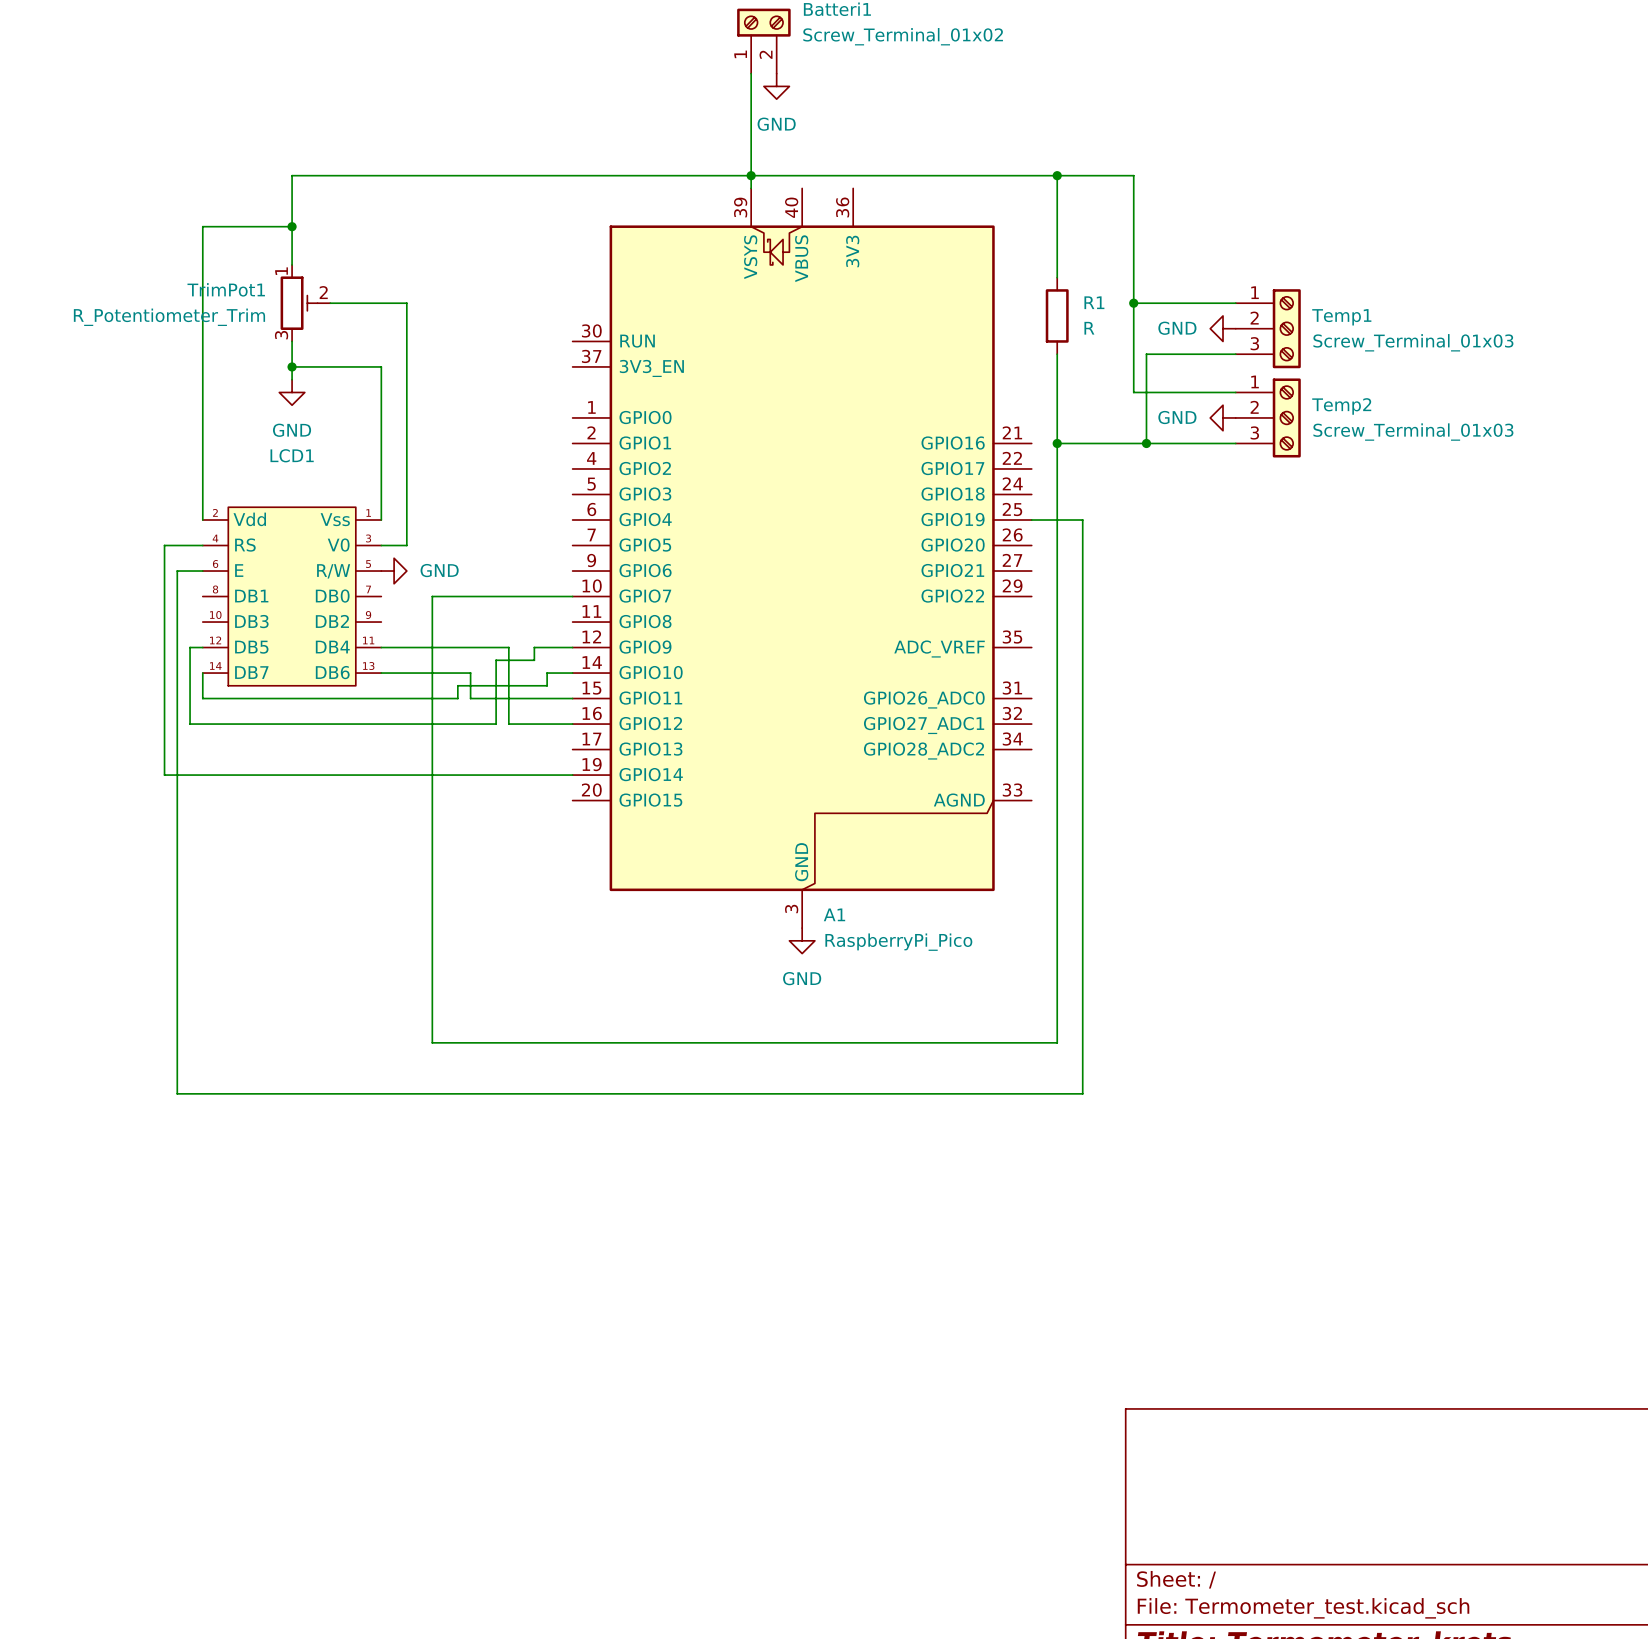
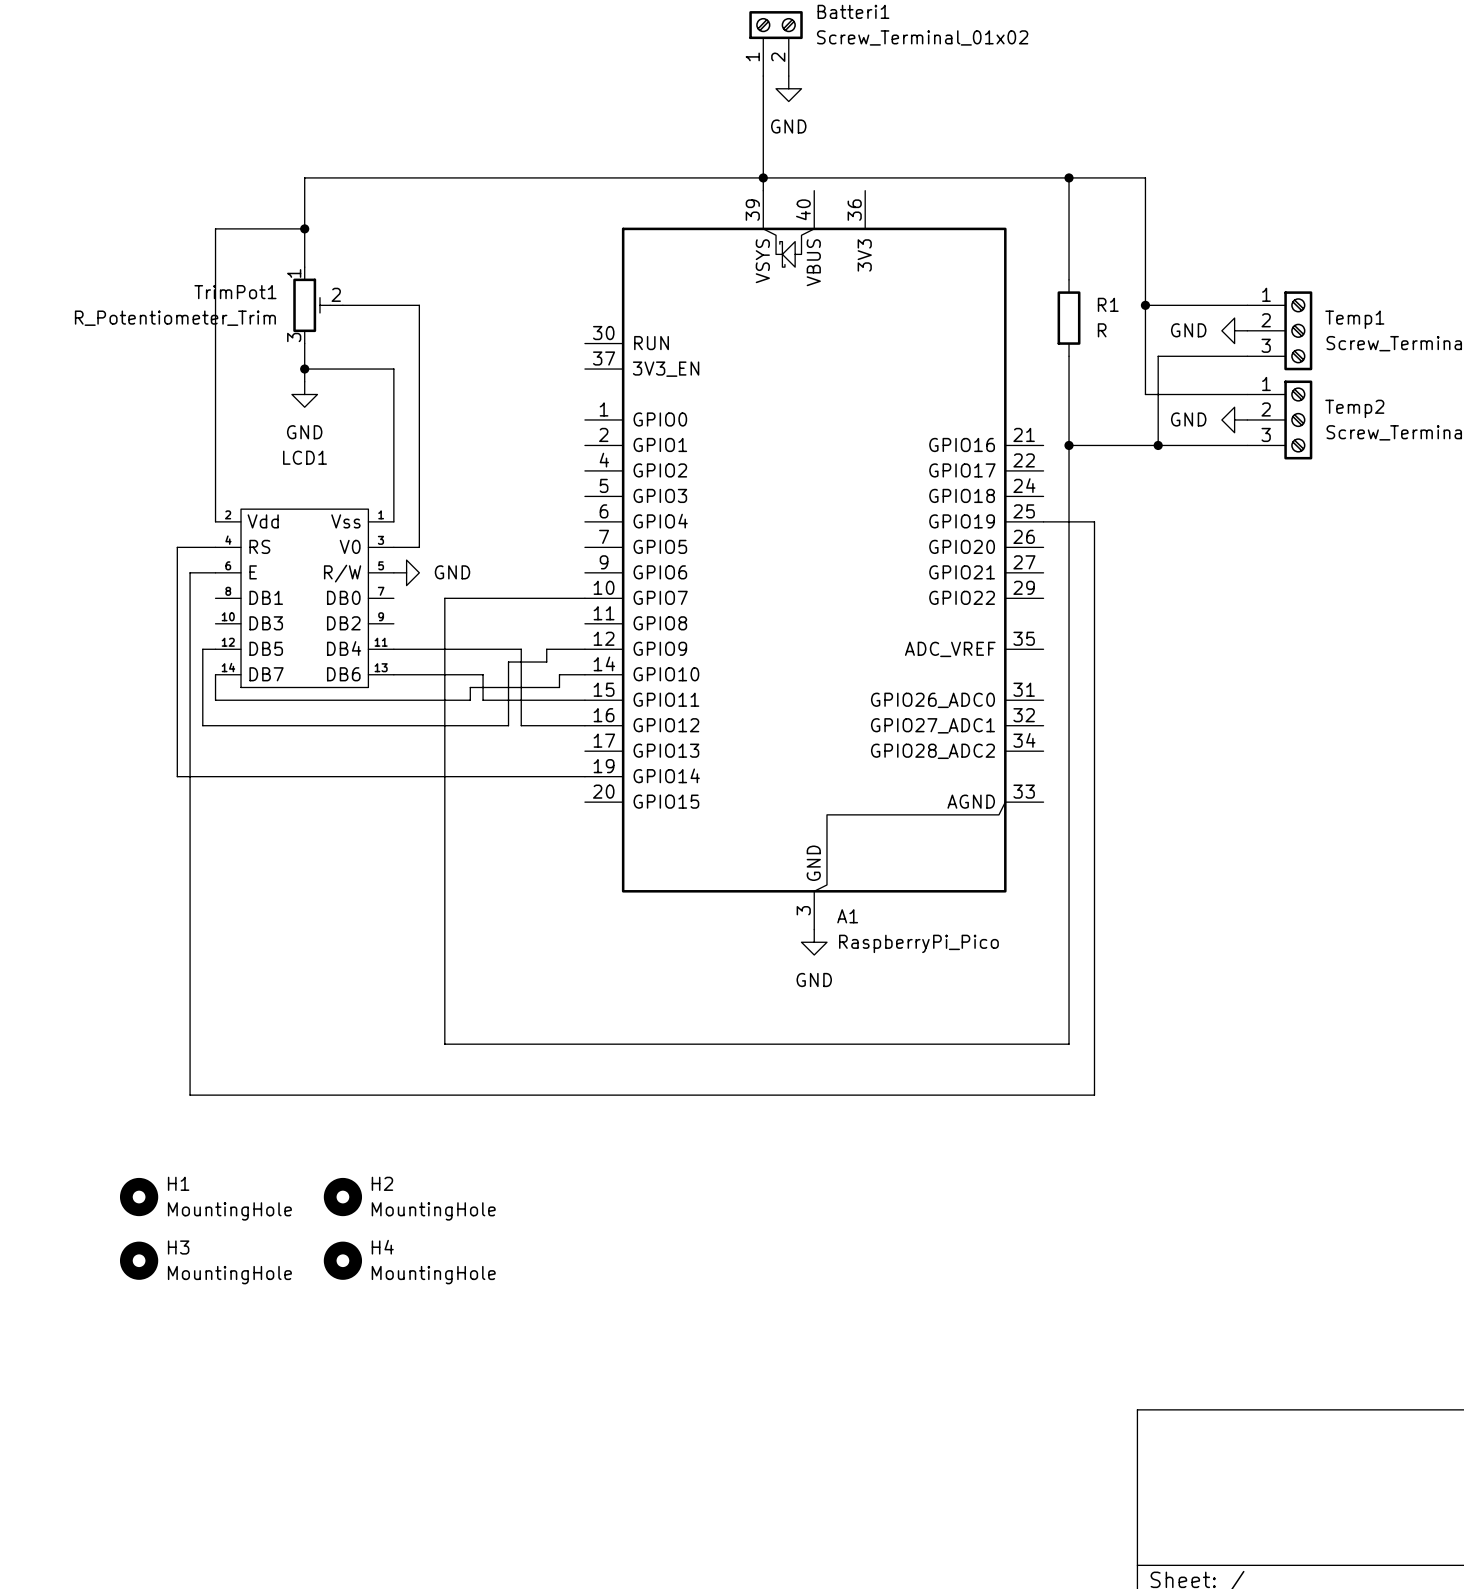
H1: none -> MountingHole (139, 1197)
H2: none -> MountingHole (342, 1197)
H3: none -> MountingHole (139, 1260)
H4: none -> MountingHole (342, 1260)

